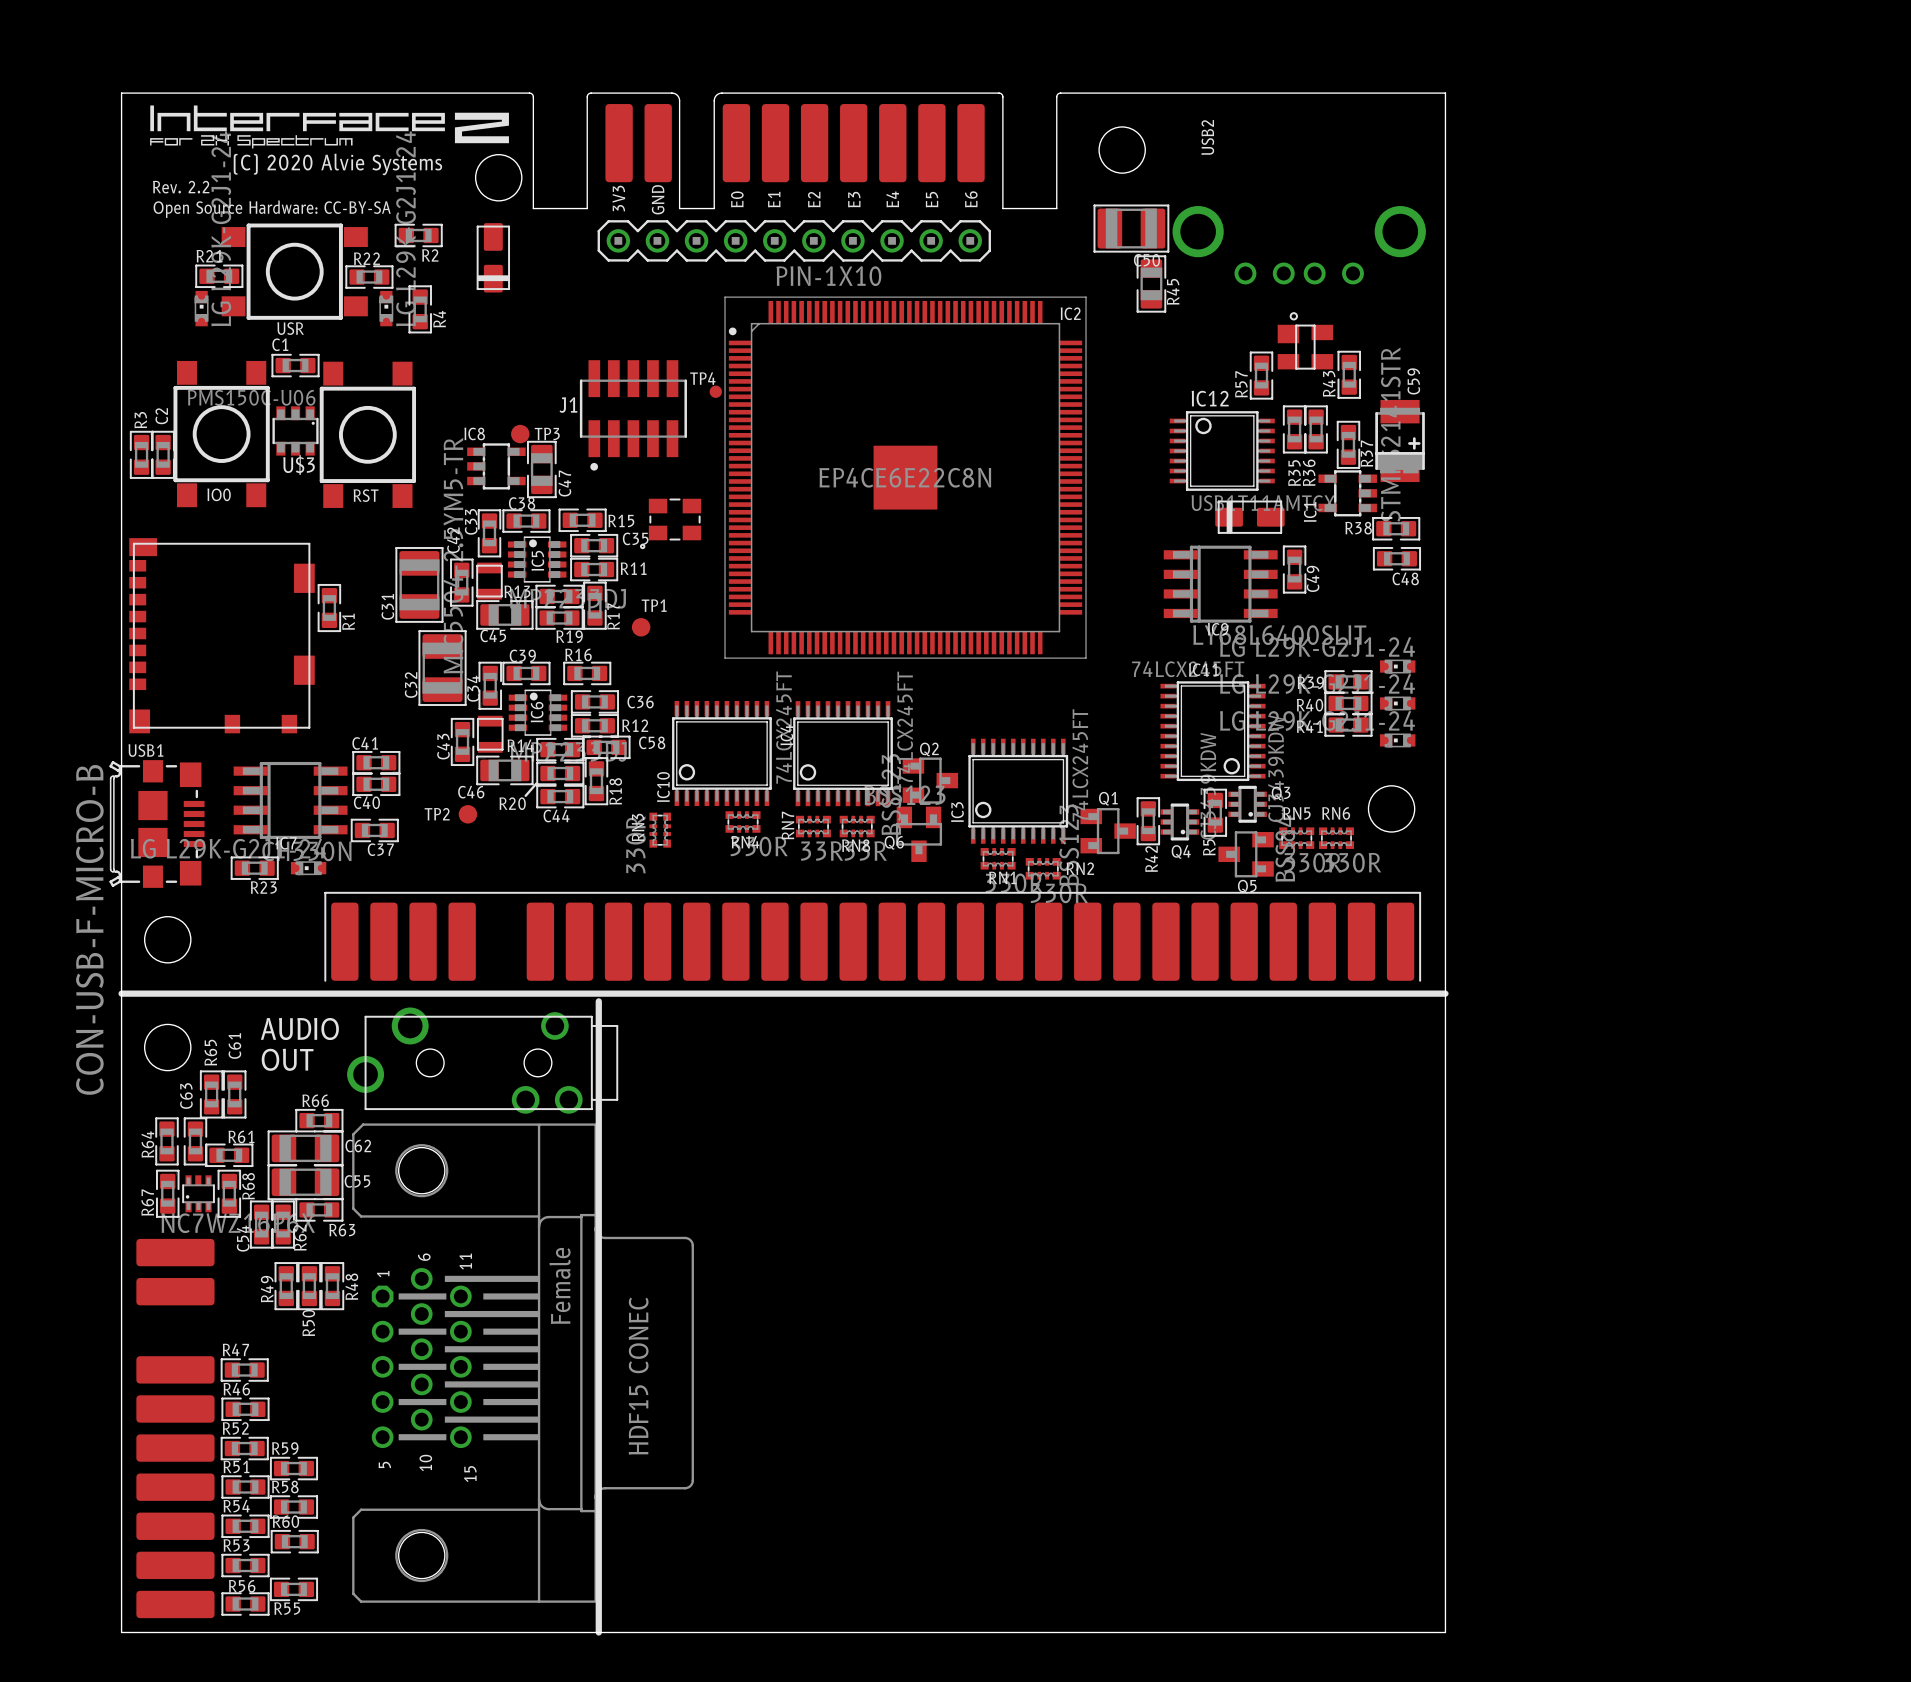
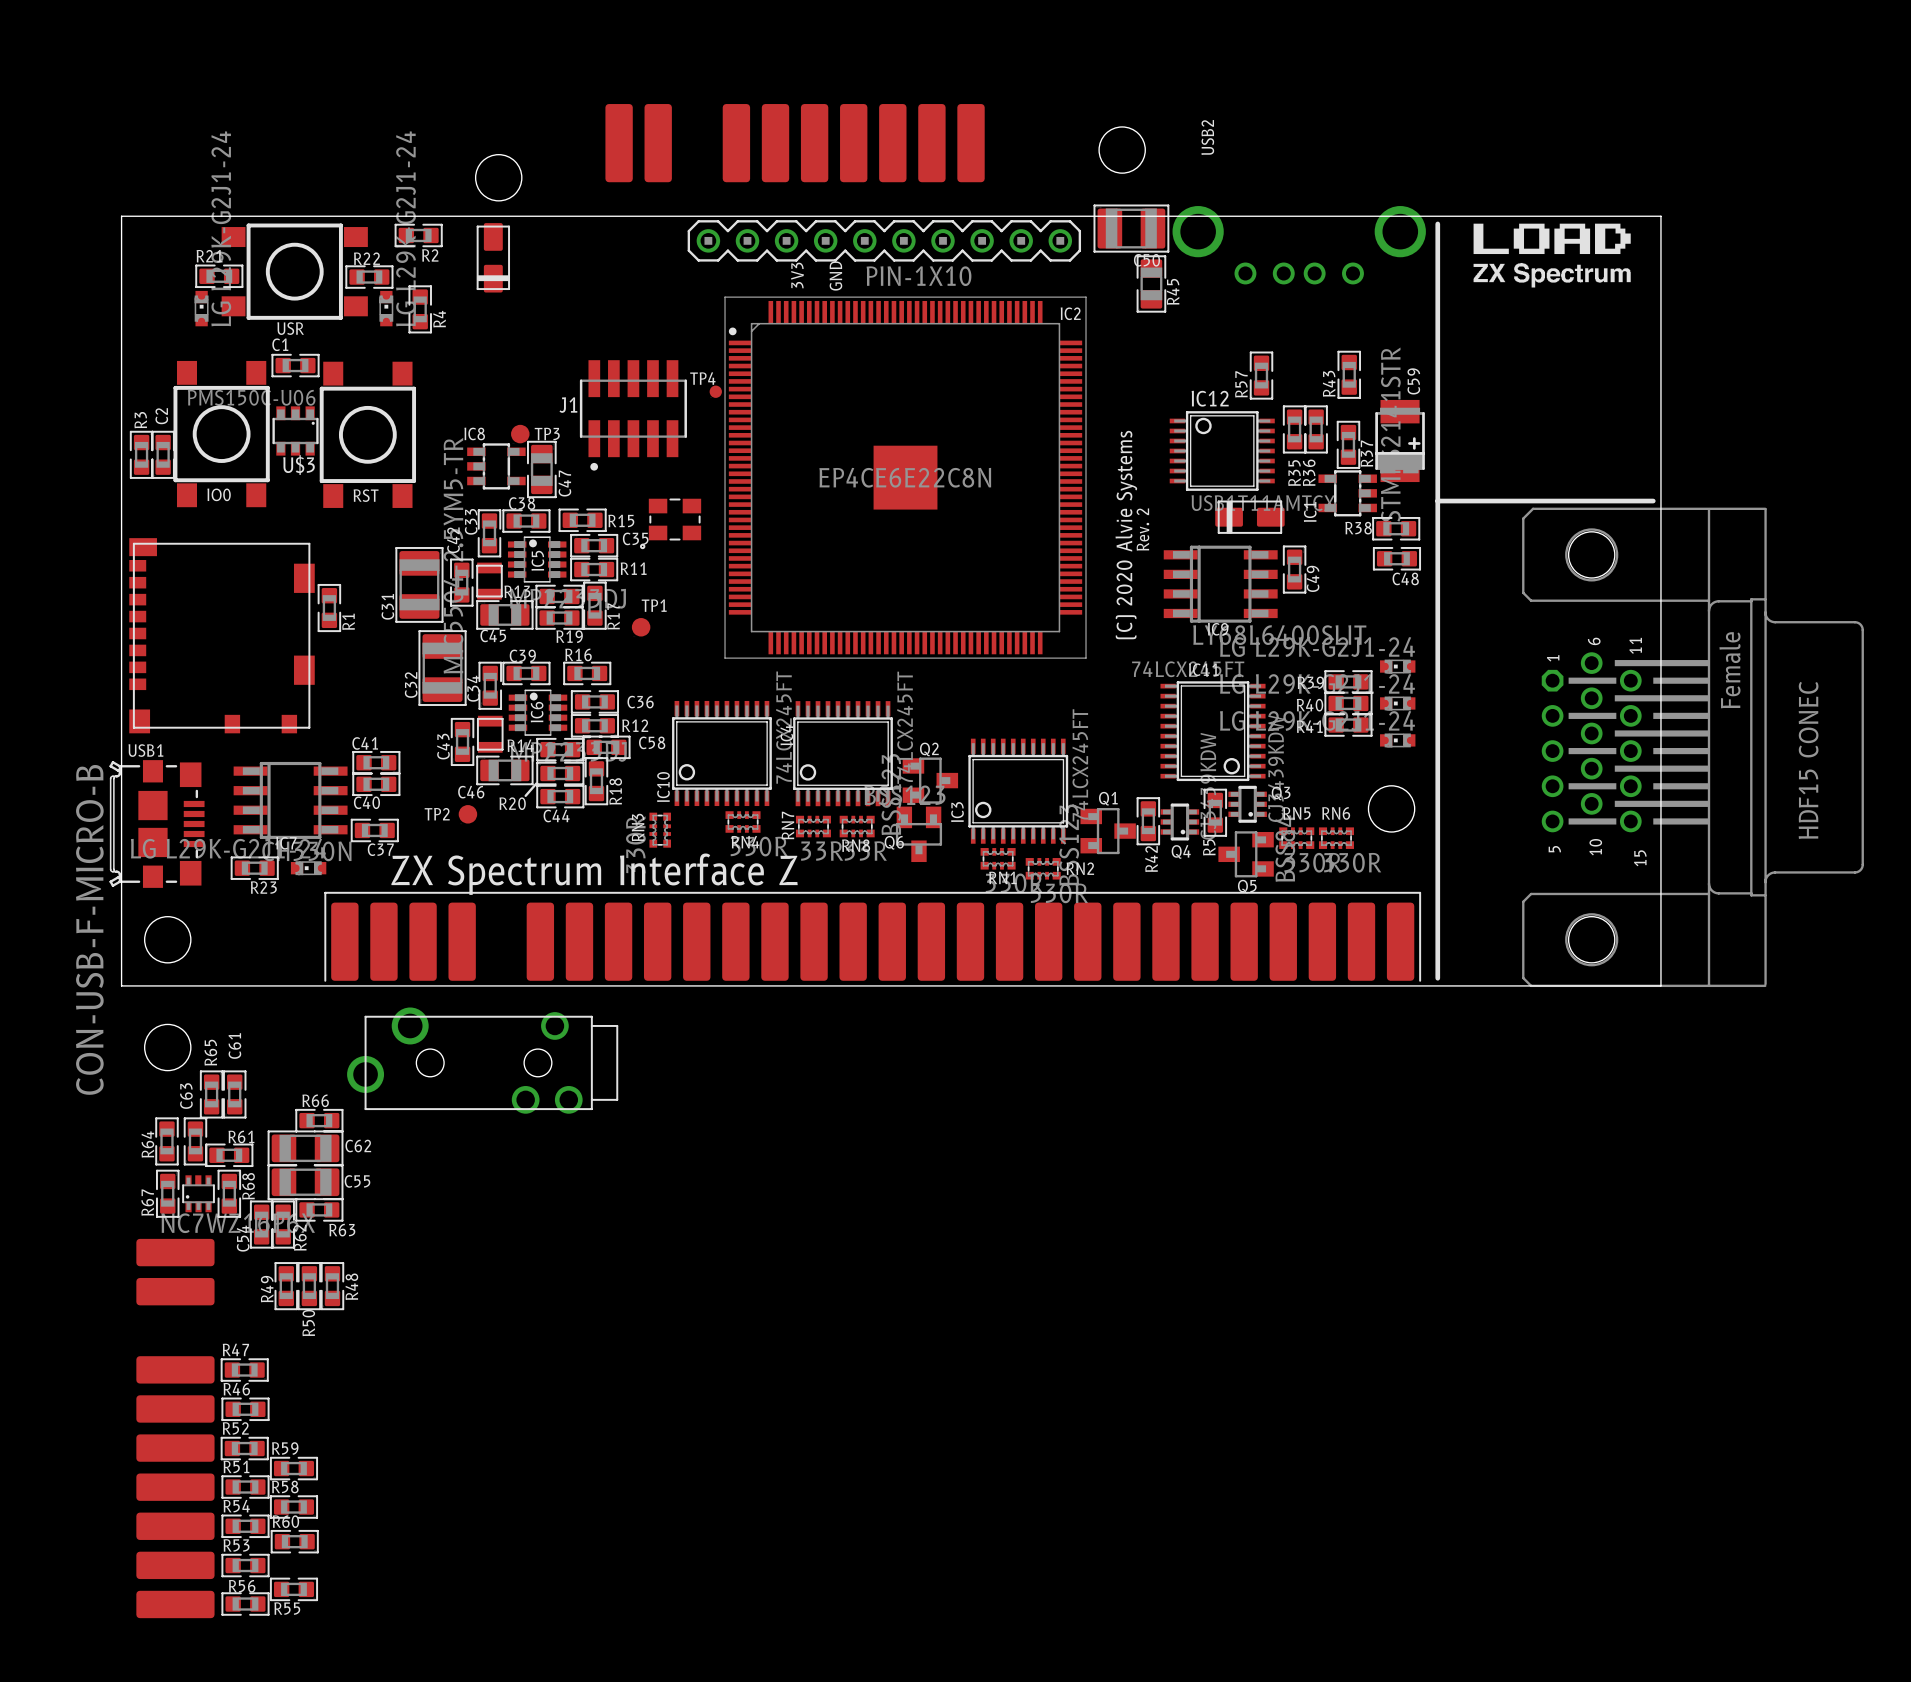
drawing: [150, 105, 509, 149] -> none
text: (C) 2020 Alvie Systems (337, 164) -> none
text: Rev. 2.2 (181, 187) -> none
text position: 3V3 (618, 198) -> 3V3 (797, 275)
text position: GND (658, 199) -> GND (835, 275)
text: E0 (737, 199) -> none
text: E1 (774, 199) -> none
text: E2 (814, 199) -> none
text: E3 (854, 199) -> none
text: E4 (892, 199) -> none
text: E5 (932, 199) -> none
text: E6 (971, 199) -> none
text: Open Source Hardware: CC-BY-SA (272, 209) -> none
board edge: (121, 216) (121, 93) (530, 93) (533, 96) (533, 208) (587, 208) (587, 96) (590, 93) (671, 93) (678, 96) (679, 100) (679, 208) (714, 208) (714, 100) (718, 93) (1000, 93) (1002, 96) (1002, 208) (1056, 208) (1056, 96) (1059, 93) (1445, 93) (1445, 1632) (121, 1632) (121, 985) -> (121, 216) (1660, 216) (1660, 985) (121, 985)
line: none -> (1437, 223) (1437, 978)
drawing: none -> [1473, 223, 1631, 288]
part position: (794, 240) -> (884, 240)
part: (1305, 340) -> none
line: none -> (1437, 501) (1653, 501)
text: none -> Rev. 2 (1142, 529)
text: none -> (C) 2020 Alvie Systems (1126, 535)
part: none -> (1693, 747)
text: none -> ZX Spectrum Interface Z (594, 874)
line: (121, 993) (1445, 993) -> none
line: (598, 1001) (598, 1632) -> none
text: AUDIO (299, 1029) -> none
text: OUT (287, 1059) -> none
part: (523, 1363) -> none

